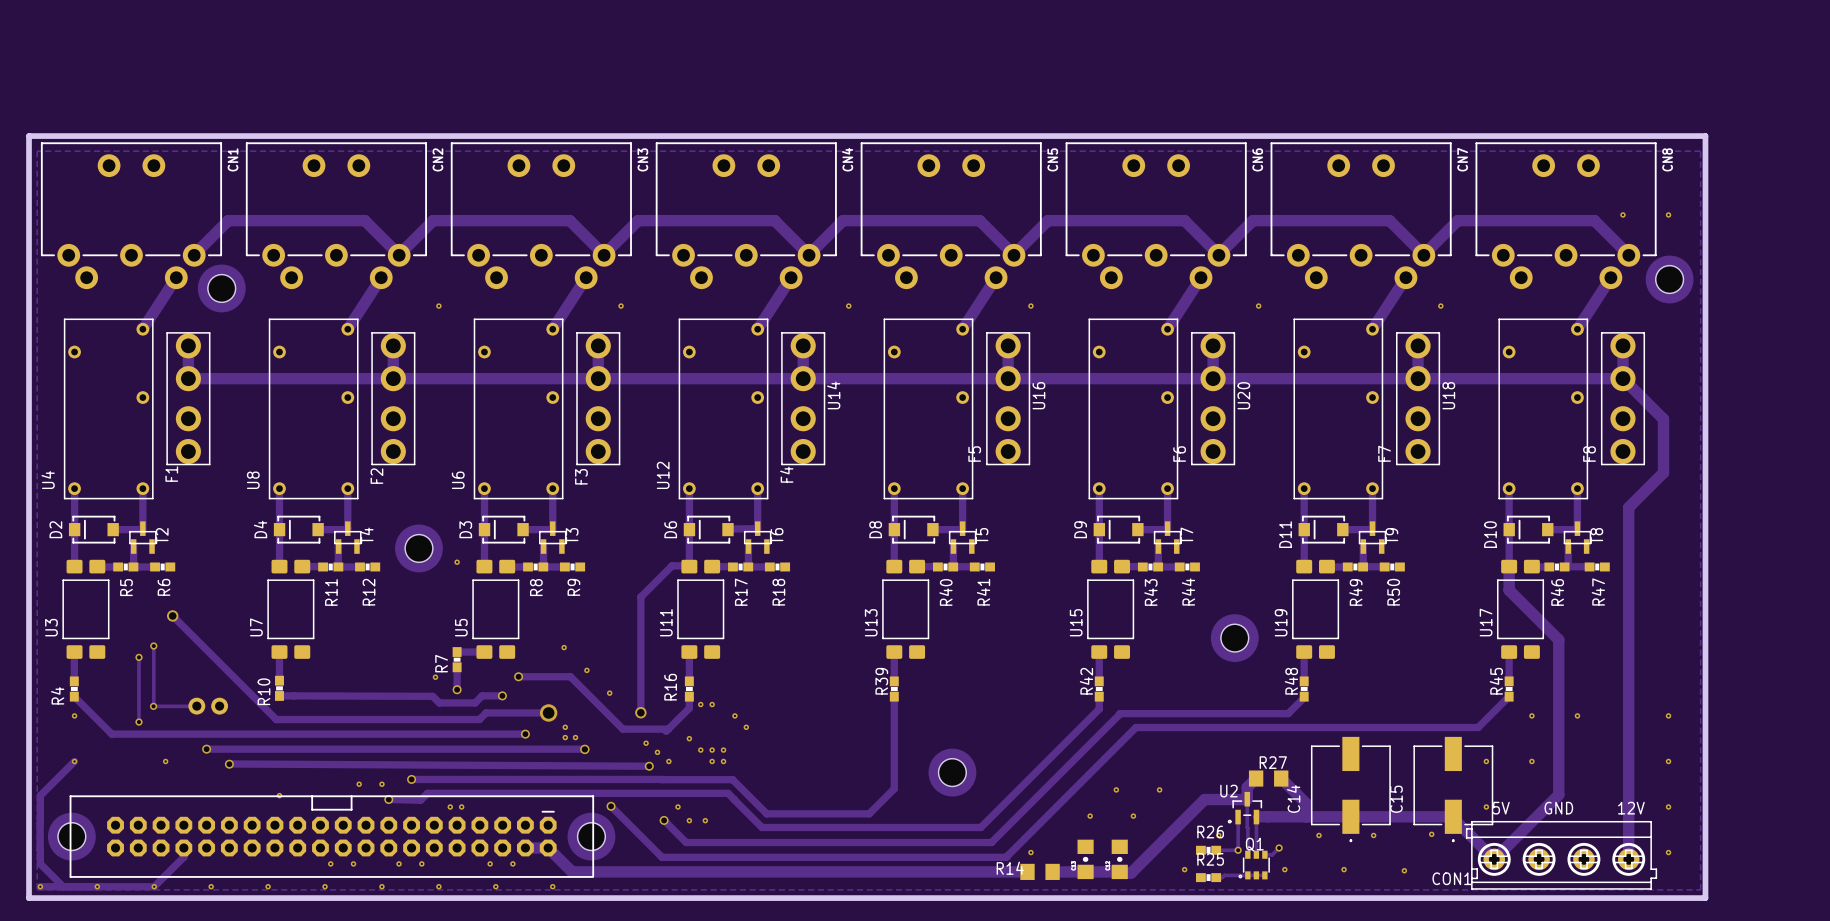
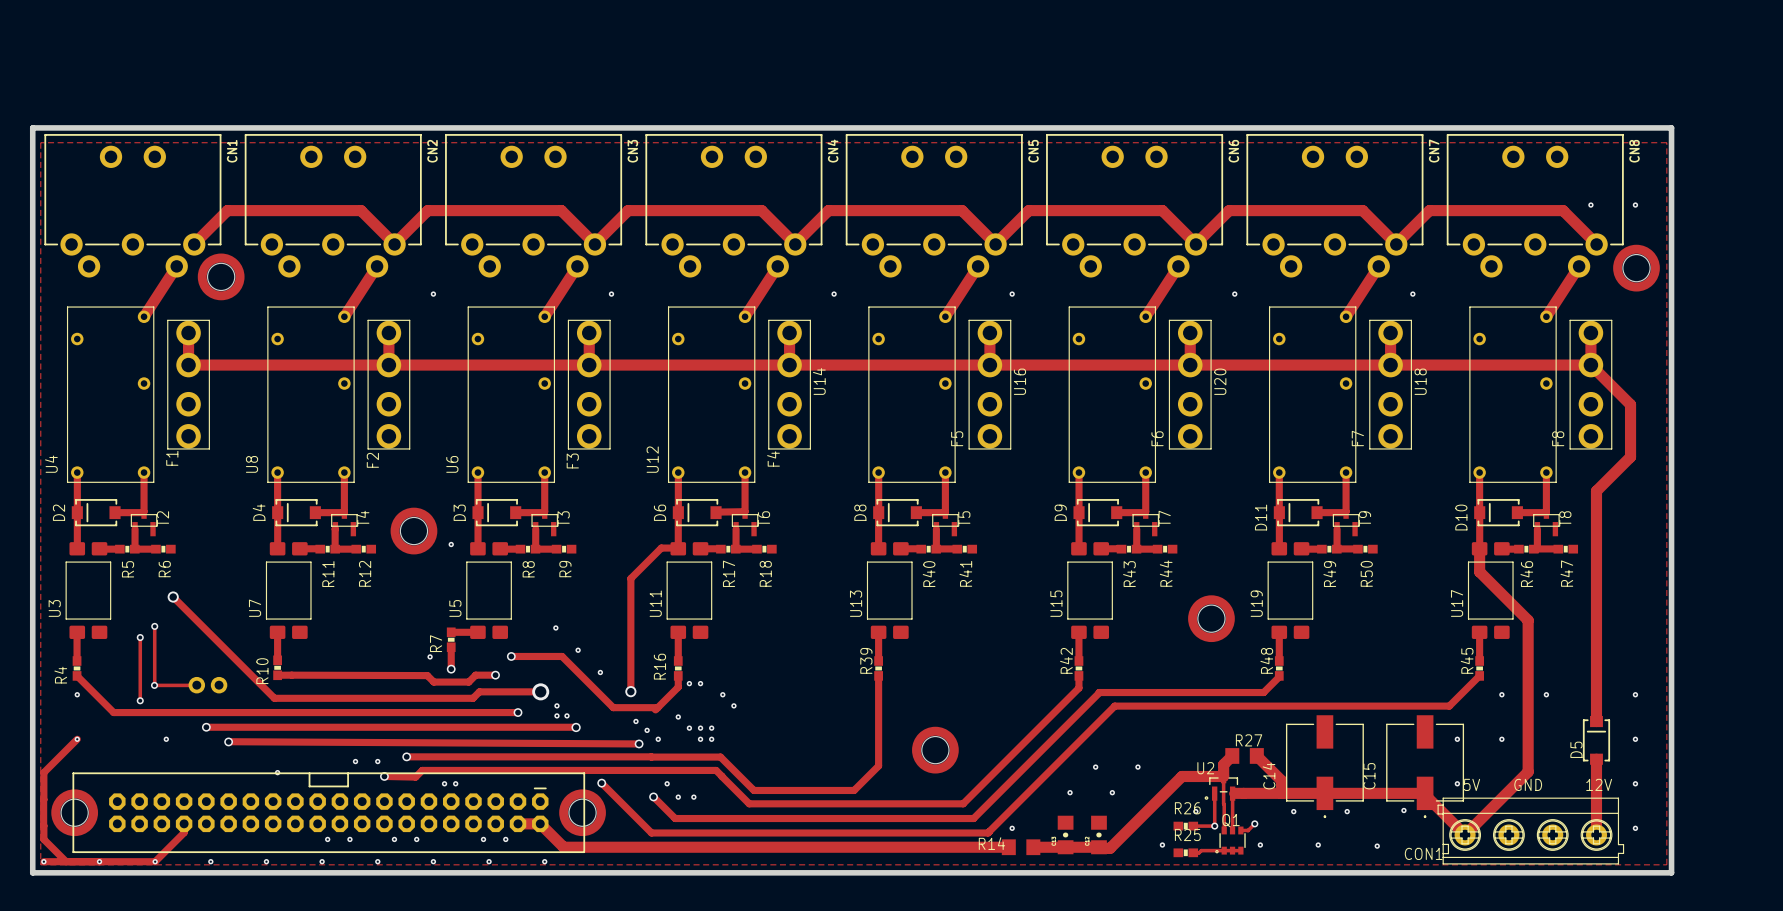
track: (1628, 743) (1628, 781) -> none
D5: none -> (1596, 740)

